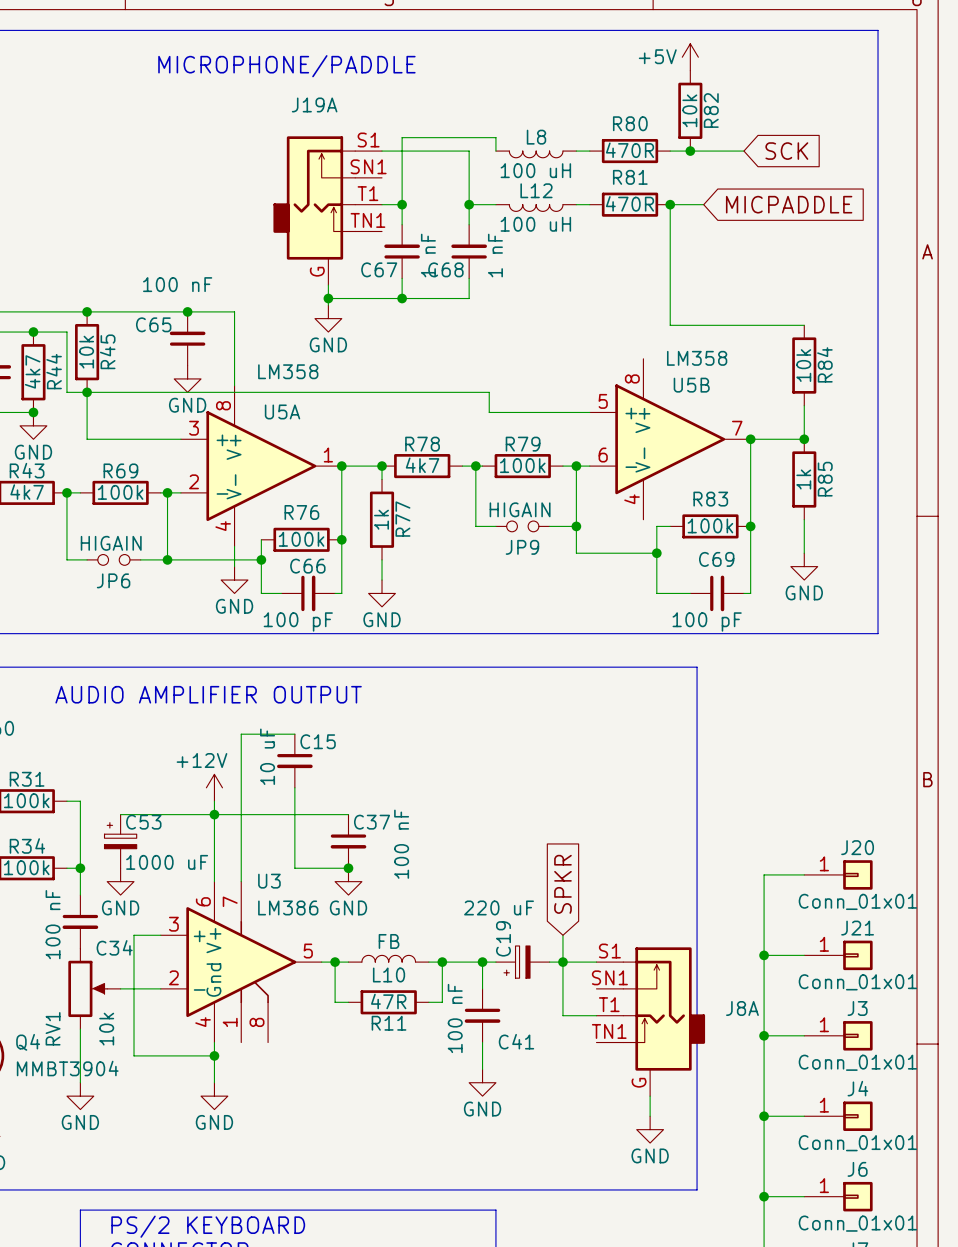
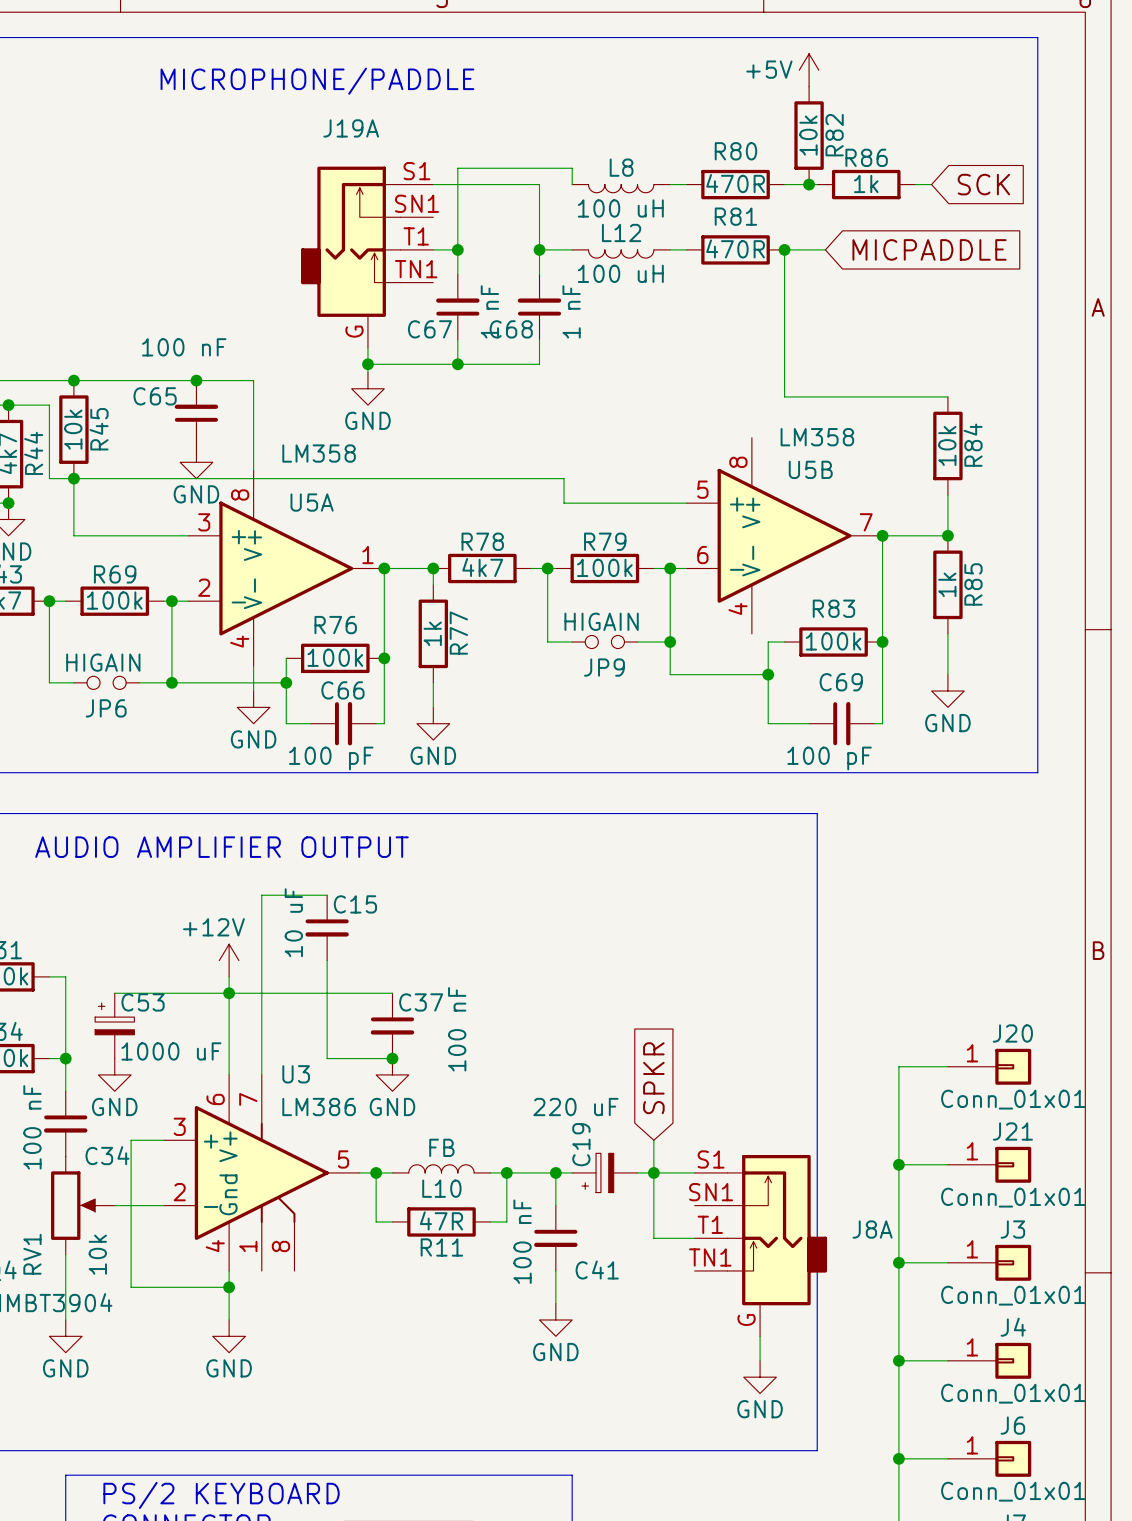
wire: (697, 151) (743, 151) -> none
R86: none -> 1k (866, 184)
wire: none -> (915, 184) (931, 184)
global label position: SCK (786, 151) -> SCK (983, 184)

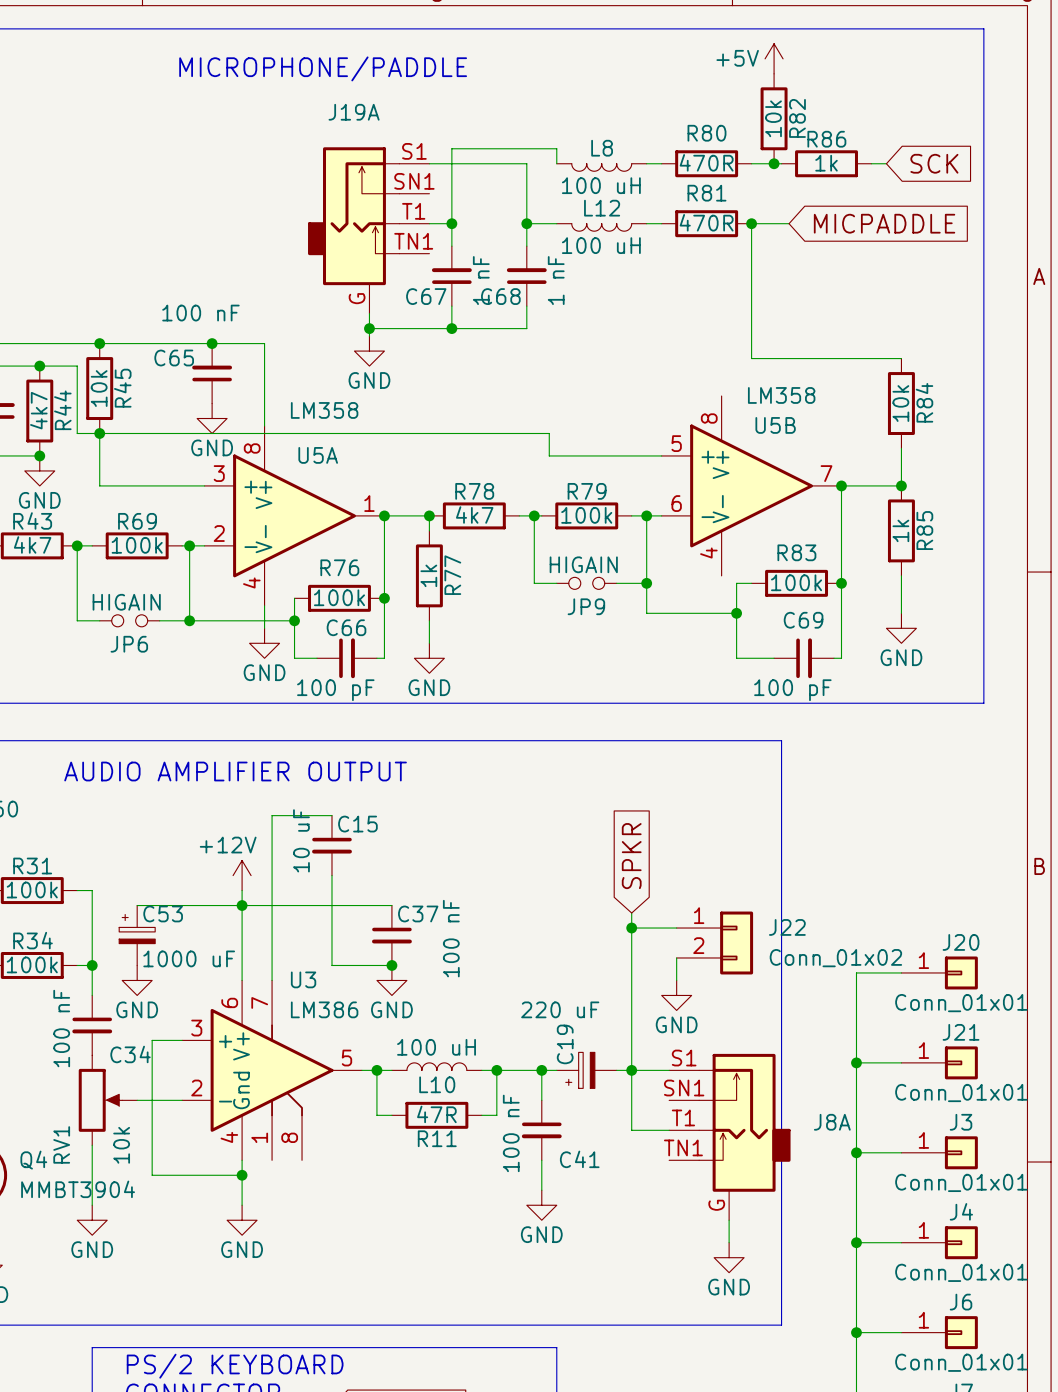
wire: none -> (631, 913) (631, 1040)
wire: none -> (631, 928) (676, 928)
junction: none -> (631, 928)
J22: none -> Conn_01x02 (714, 943)
wire: none -> (676, 957) (676, 980)
global label position: SPKR (653, 1078) -> SPKR (631, 856)
power symbol: none -> GND (676, 995)
L10 value: FB (441, 1147) -> 100 uH (436, 1047)

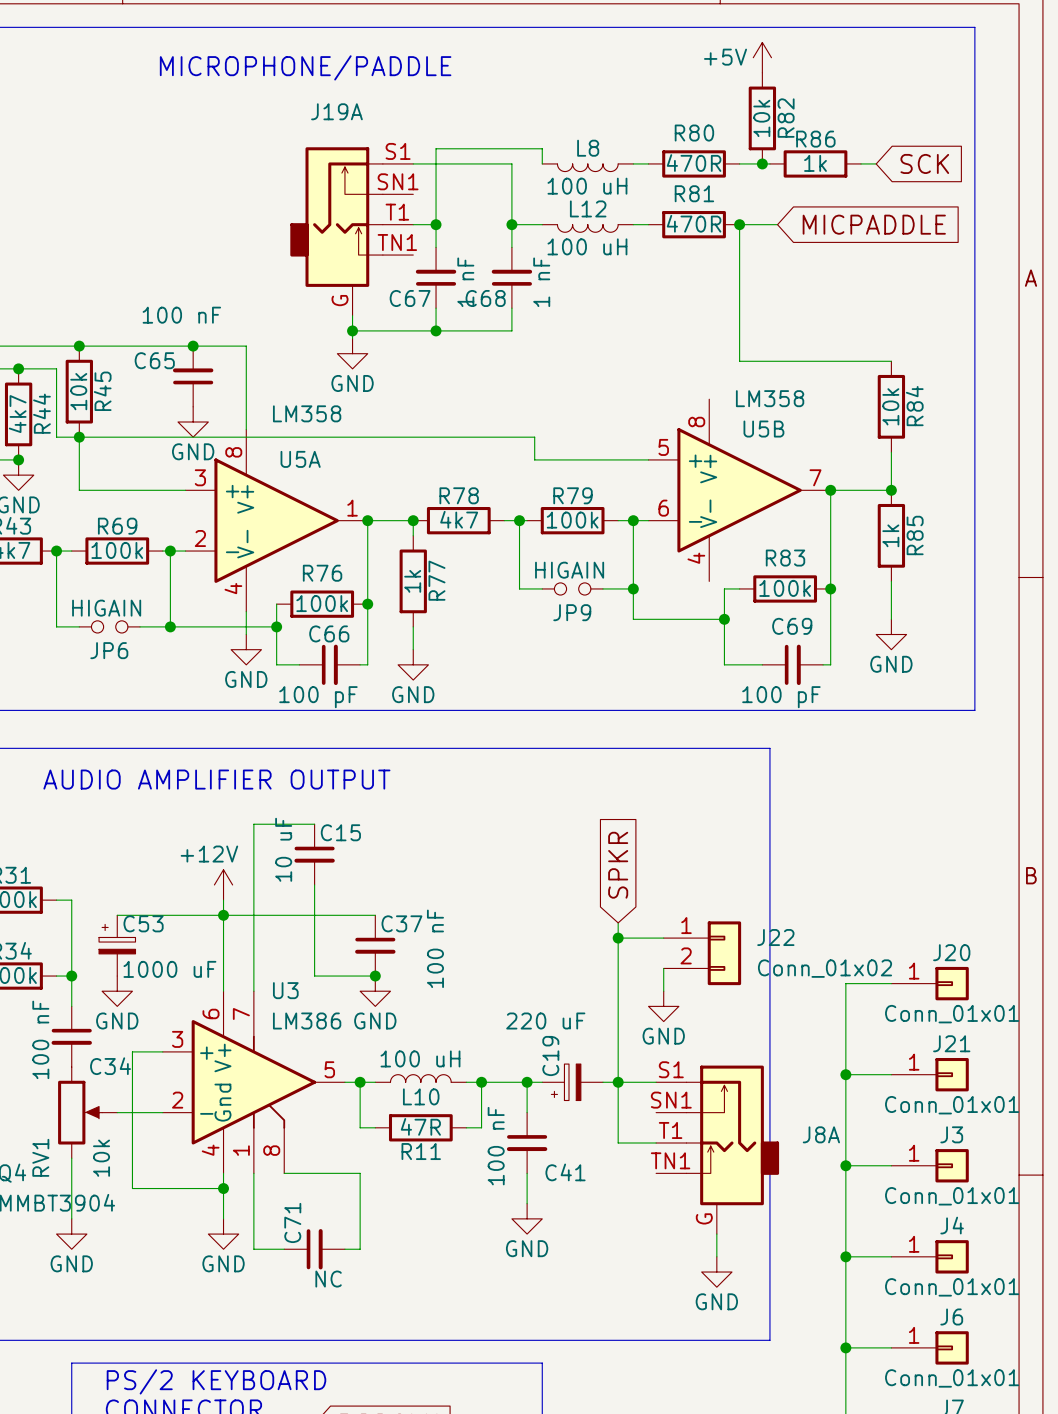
wire: none -> (253, 1173) (253, 1249) (284, 1249)
wire: none -> (284, 1173) (360, 1173) (360, 1249) (344, 1249)
C71: none -> NC (314, 1249)

